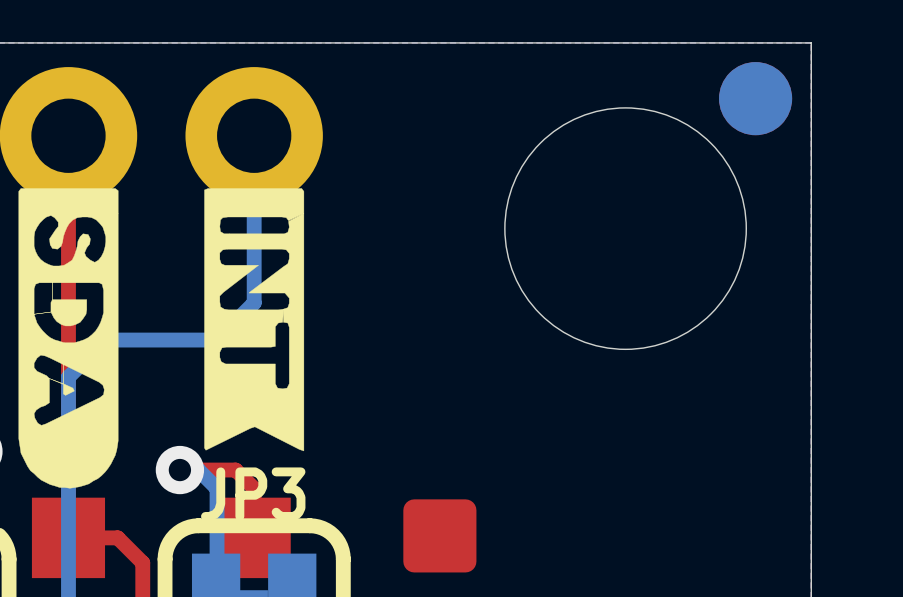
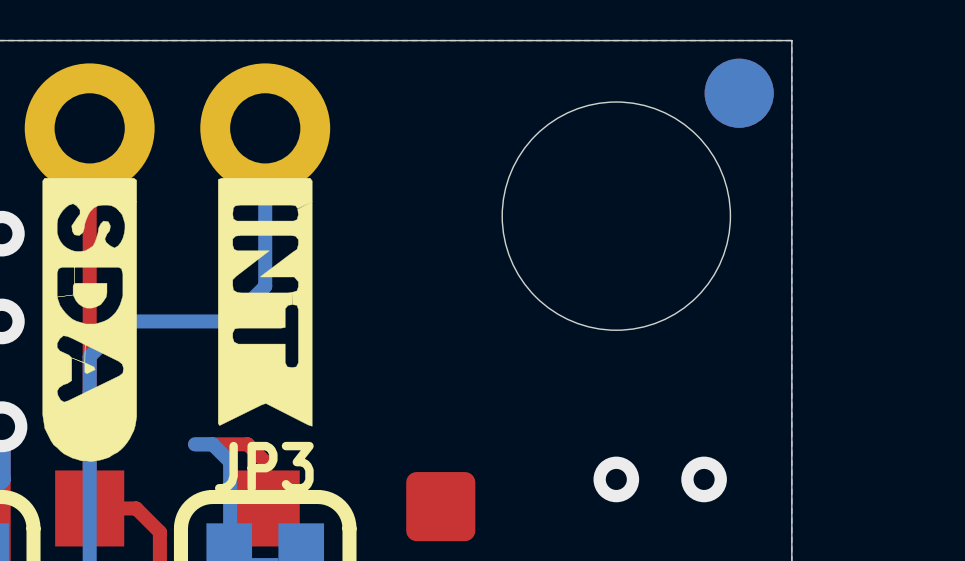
via: (179, 470) -> none
via: none -> (616, 479)
via: none -> (704, 479)

